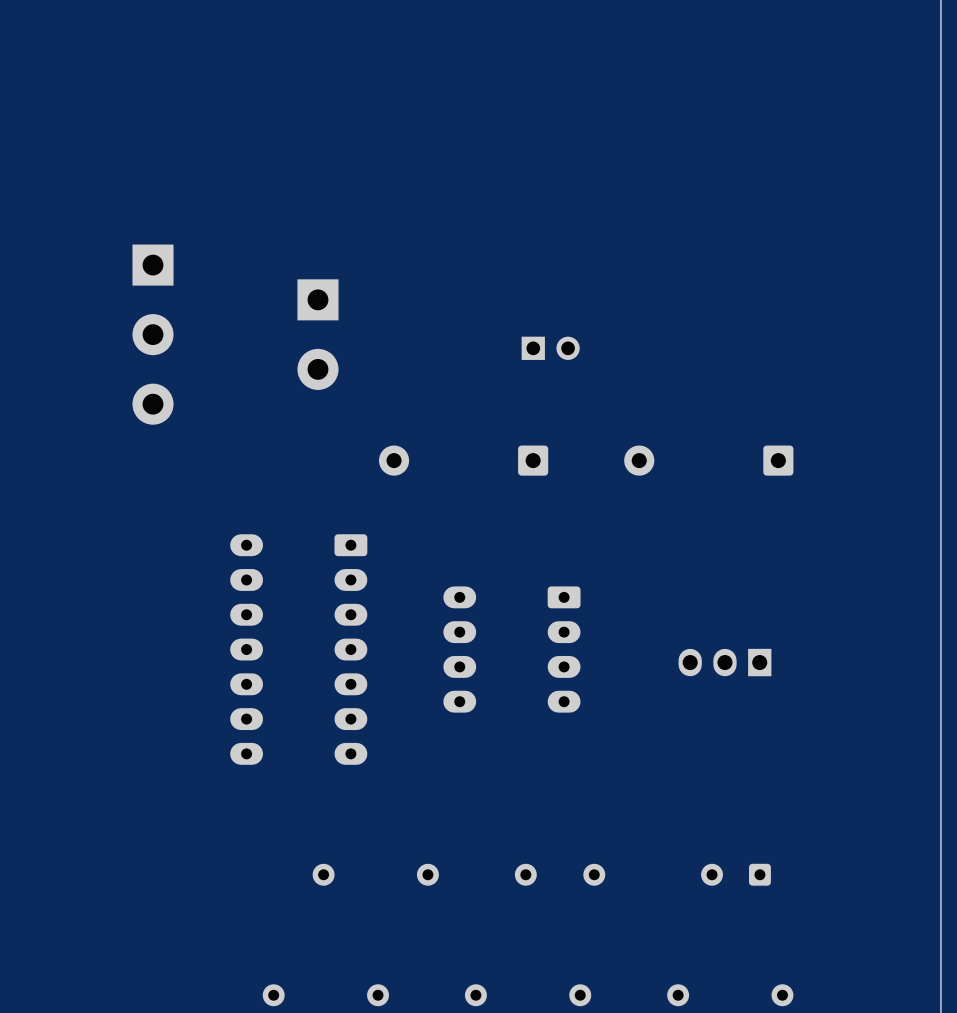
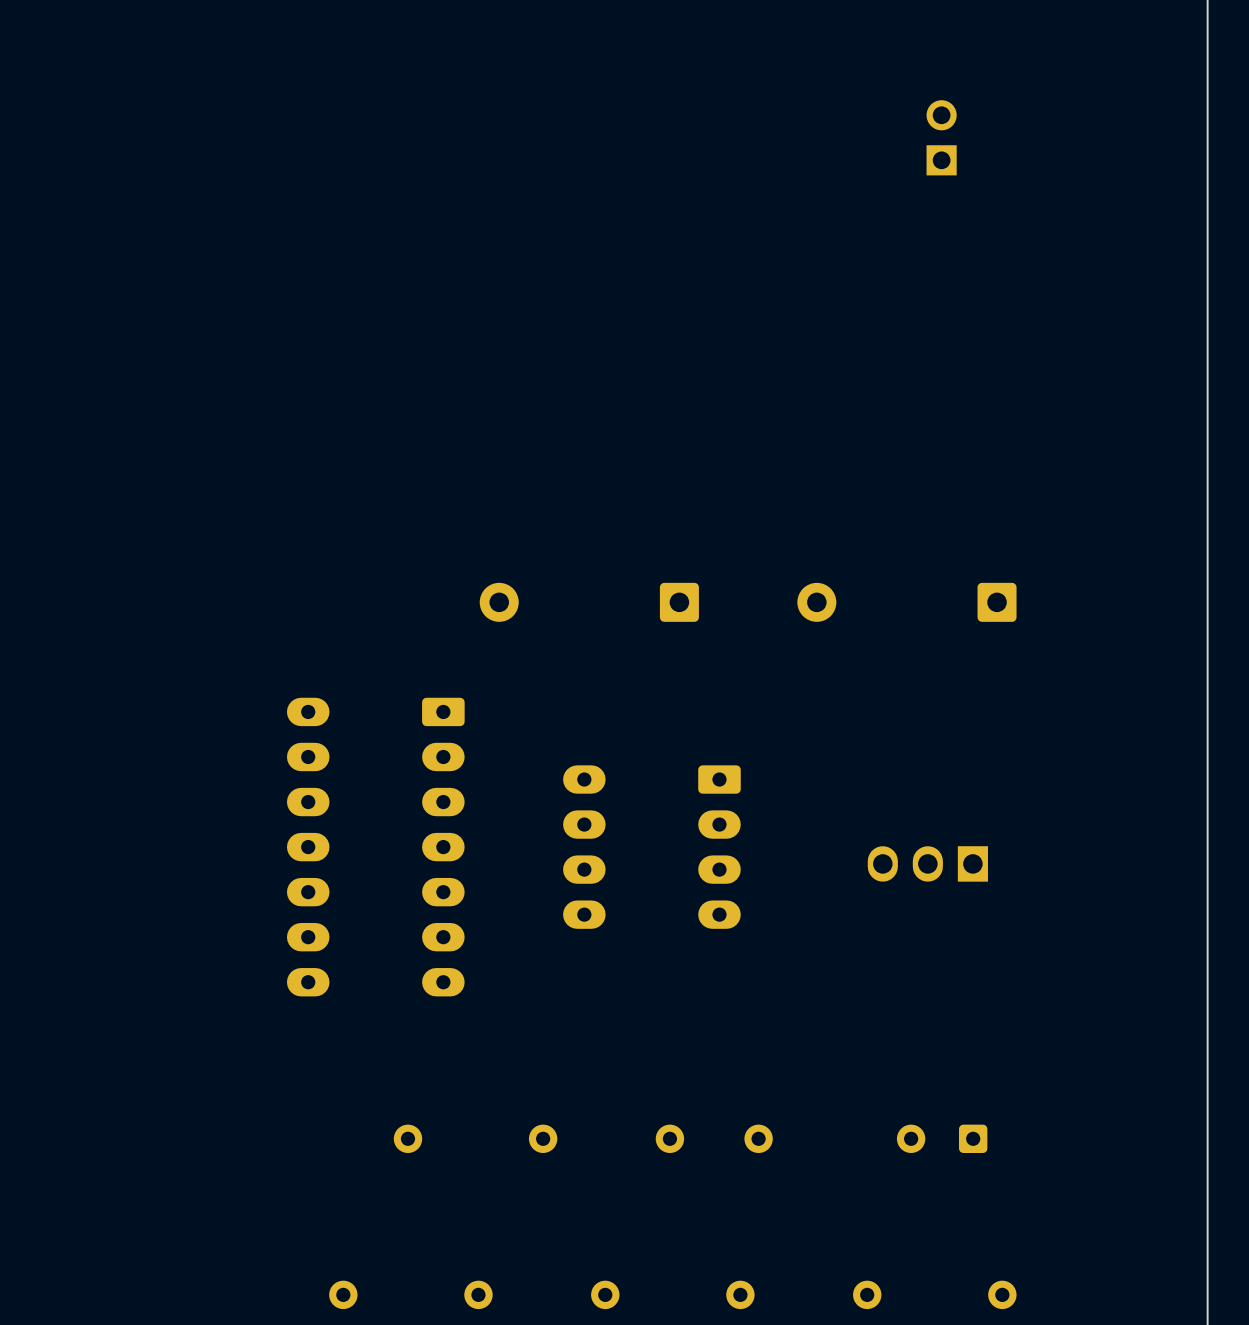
part: (153, 334) -> none
part: (317, 334) -> none
part rotation: 0° (550, 348) -> 90° counterclockwise (941, 137)
part position: (550, 348) -> (941, 137)

